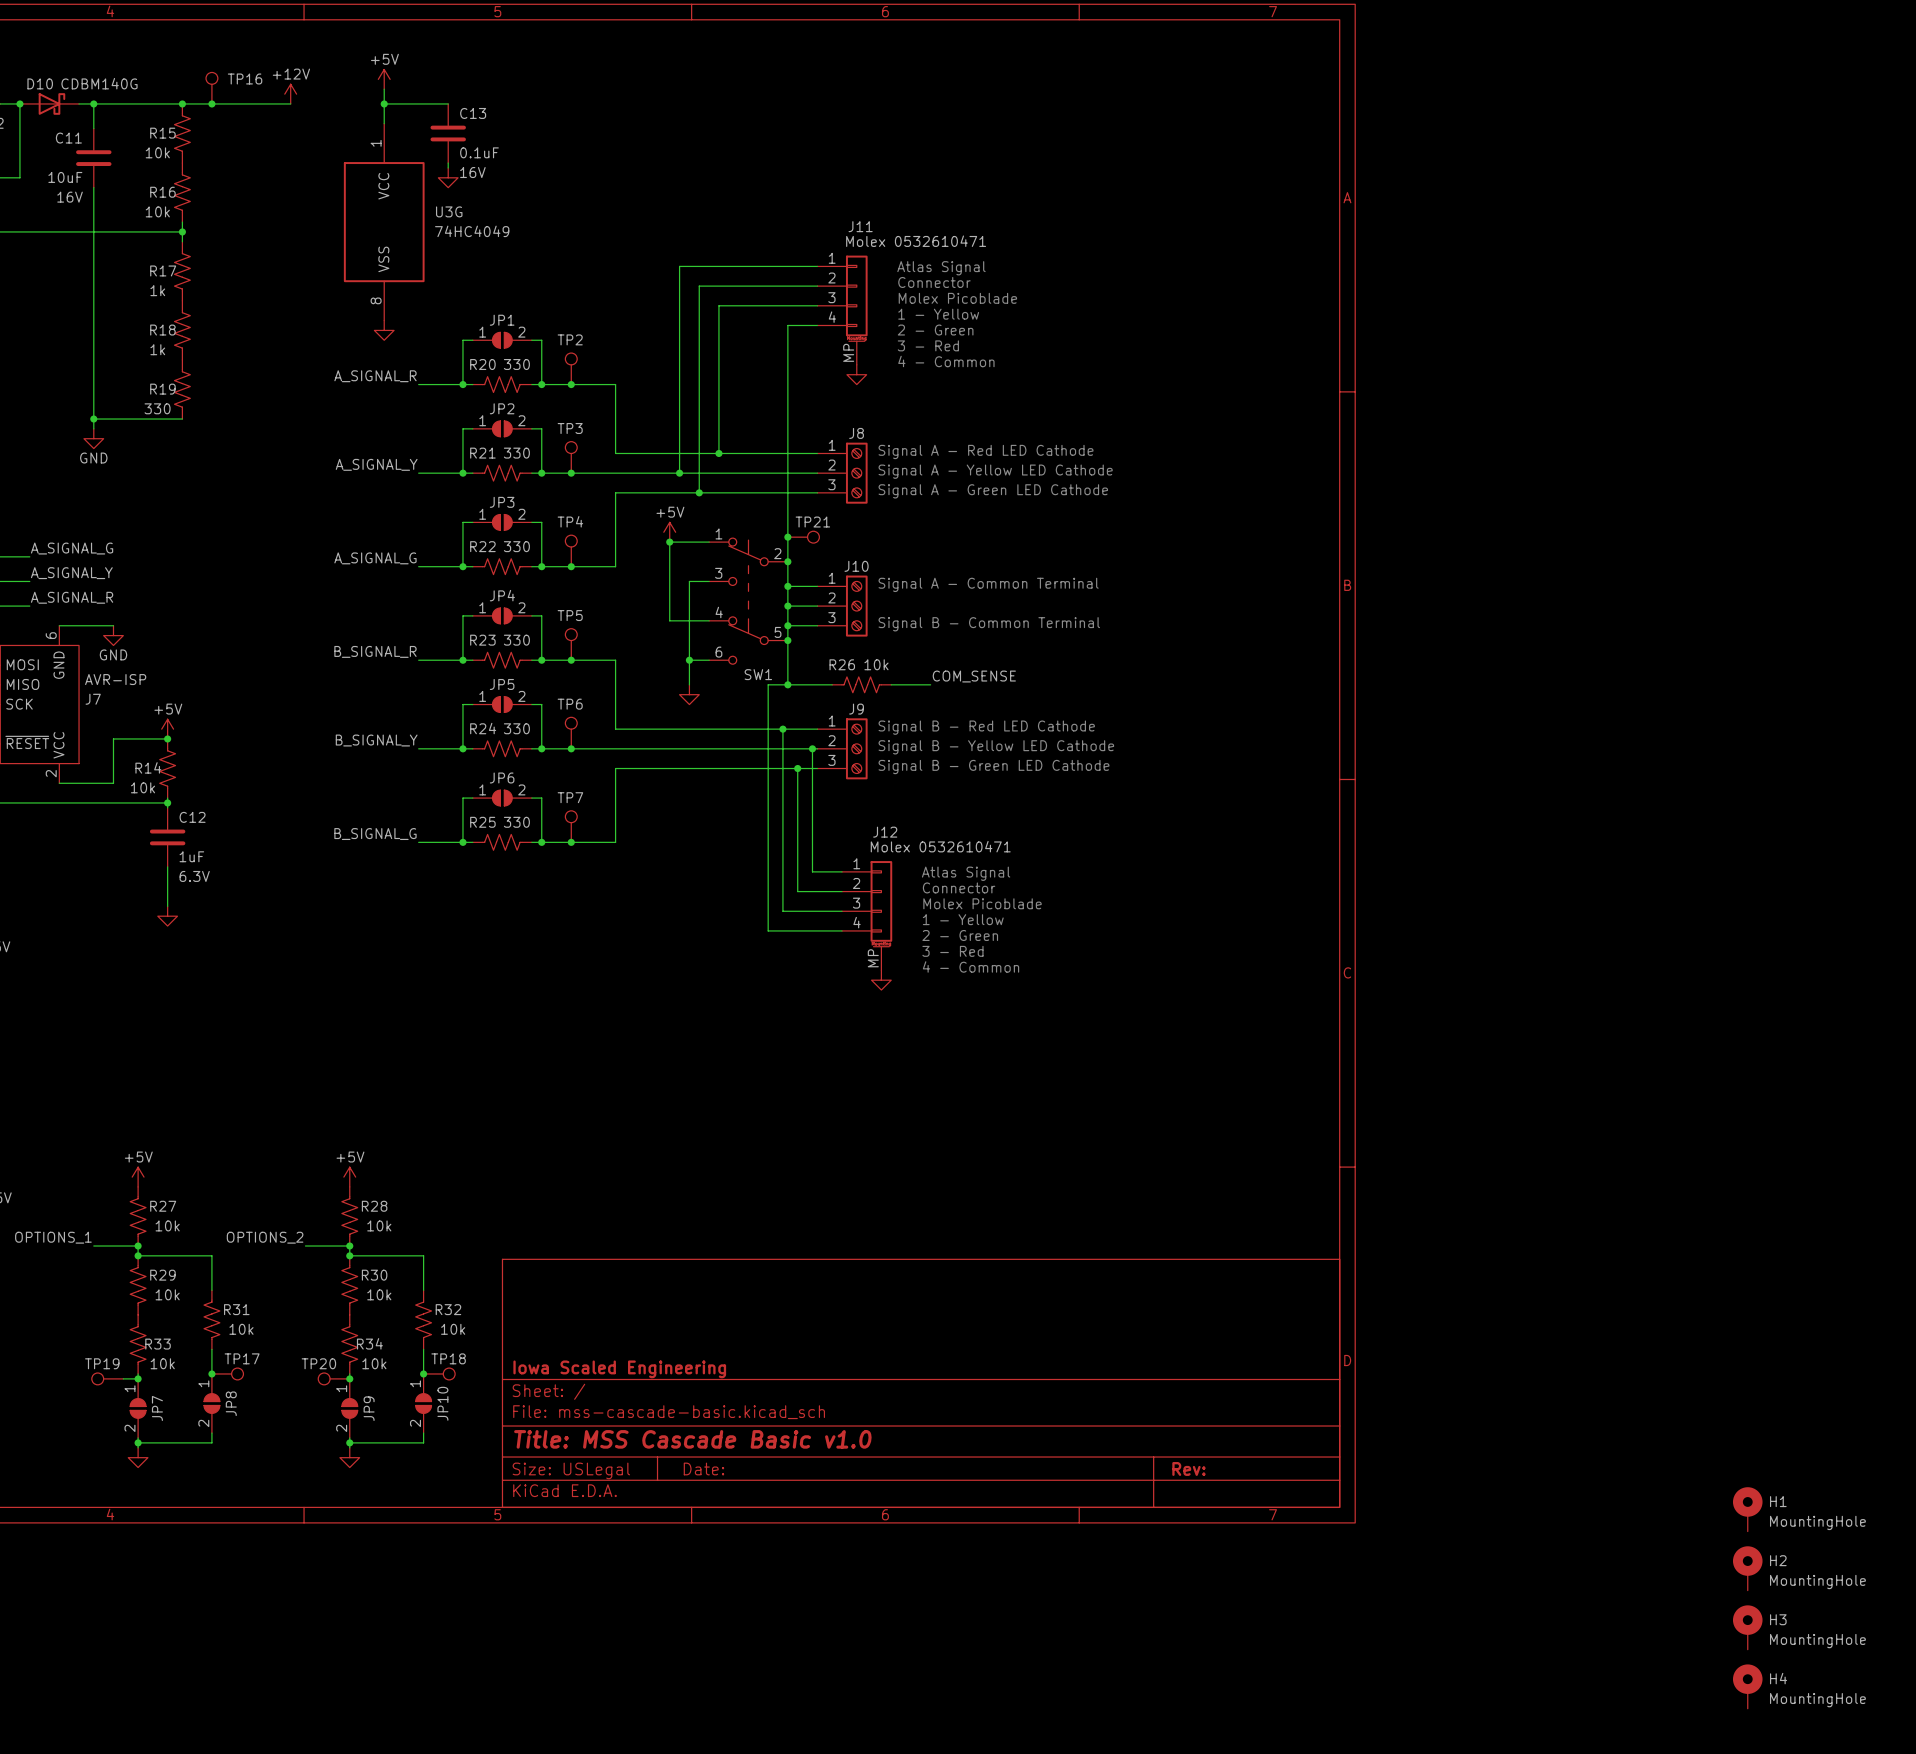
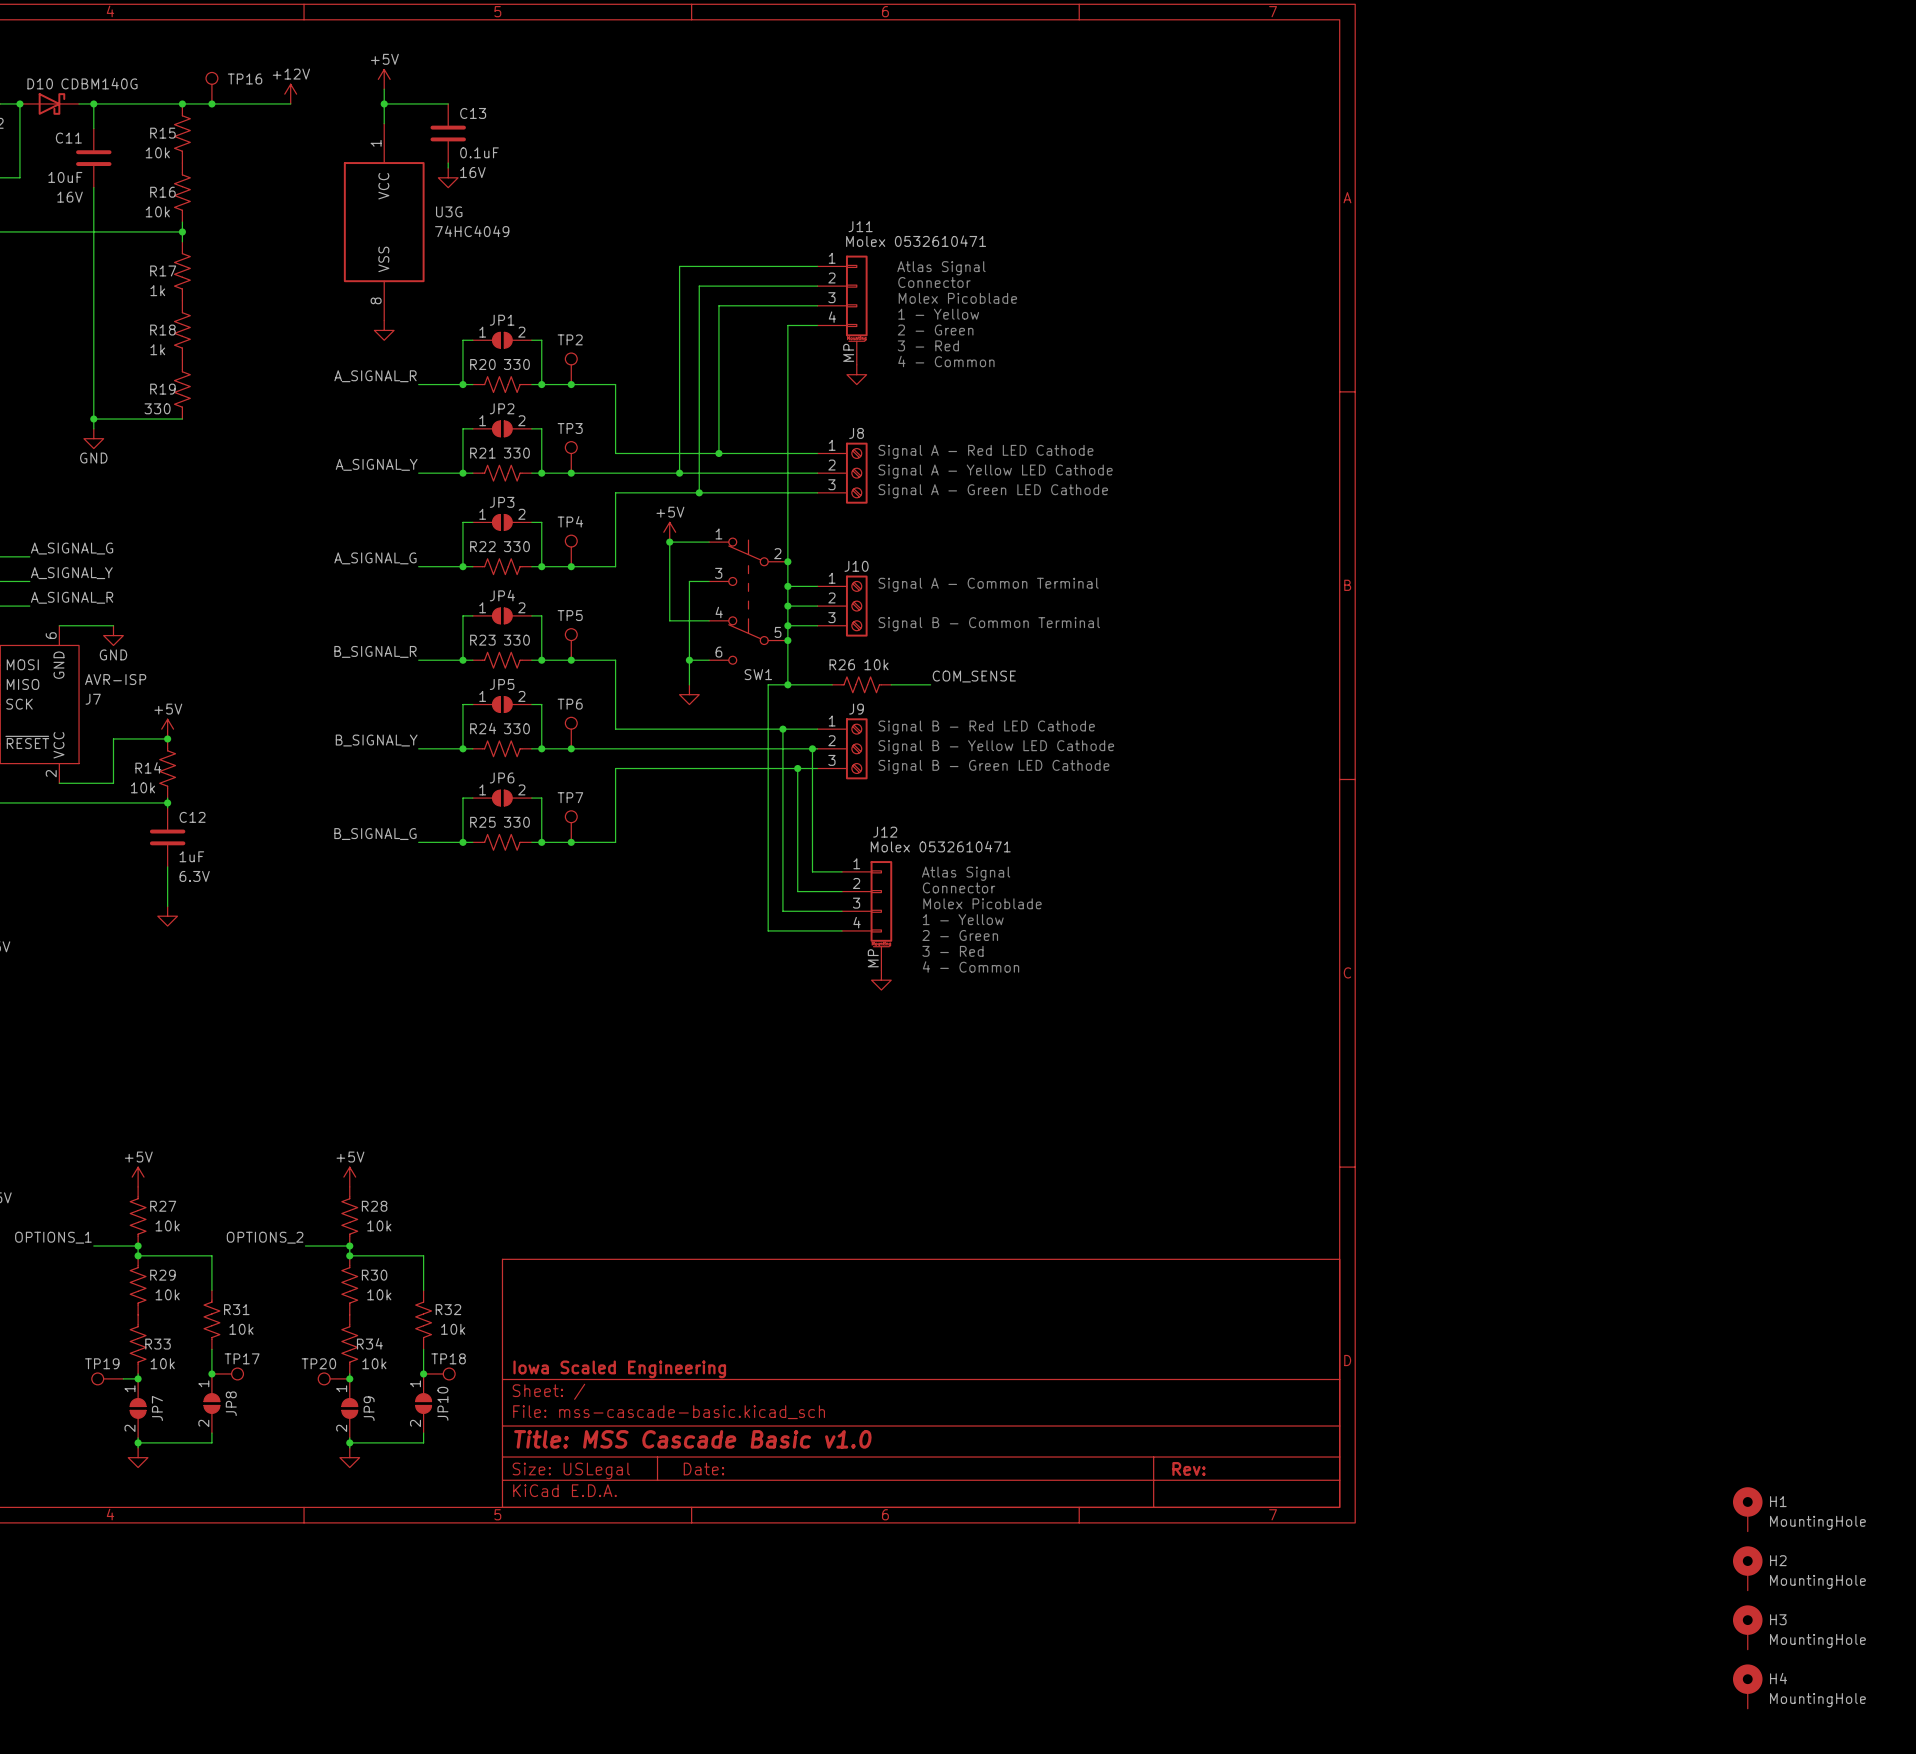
junction: (787, 537) -> none
TP21: (803, 537) -> none

